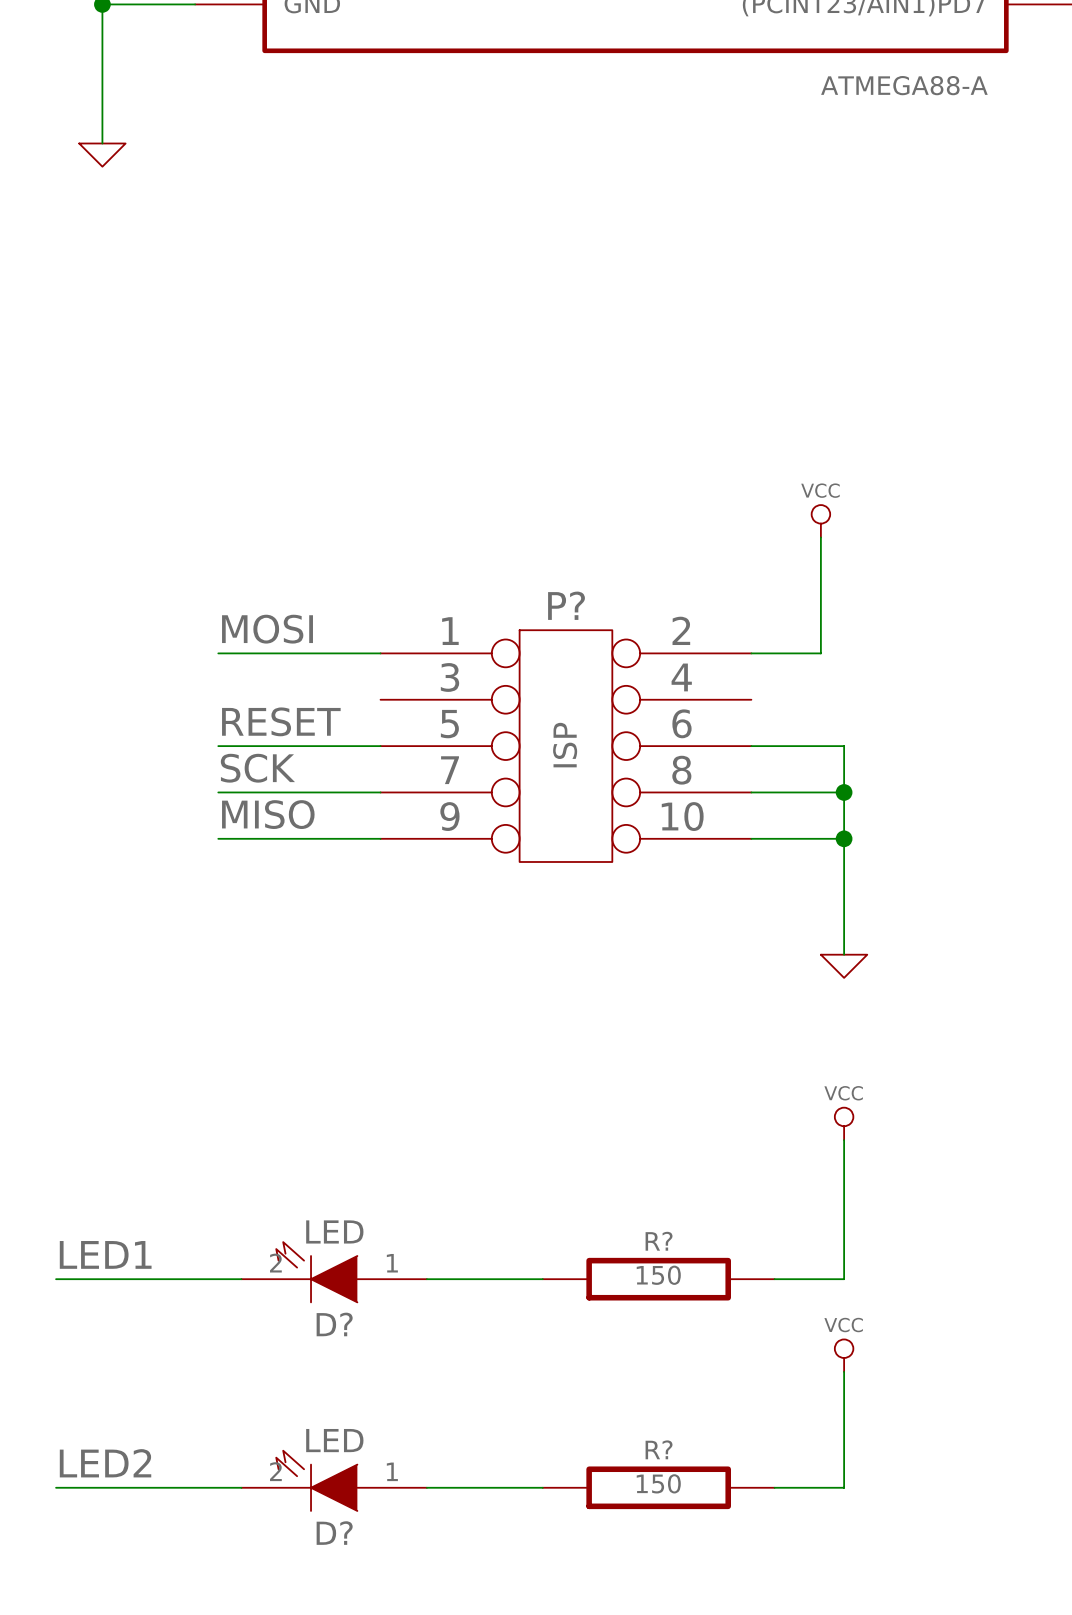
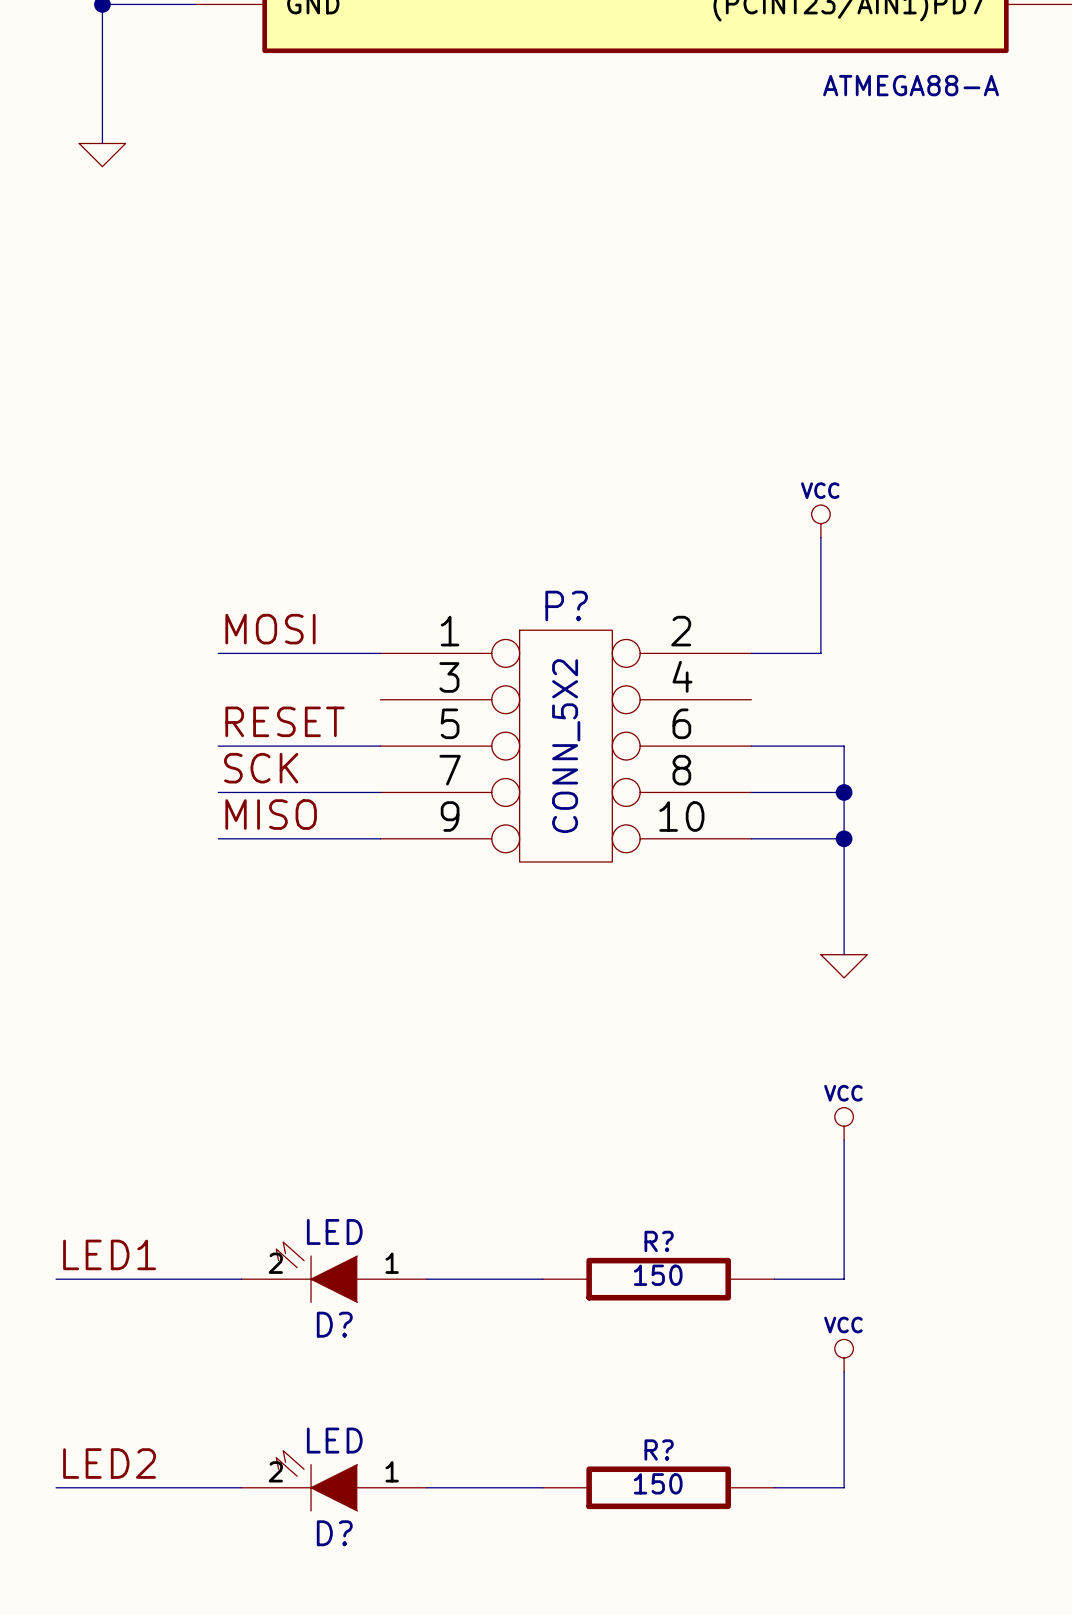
P? value: ISP (565, 745) -> CONN_5X2 (566, 746)

